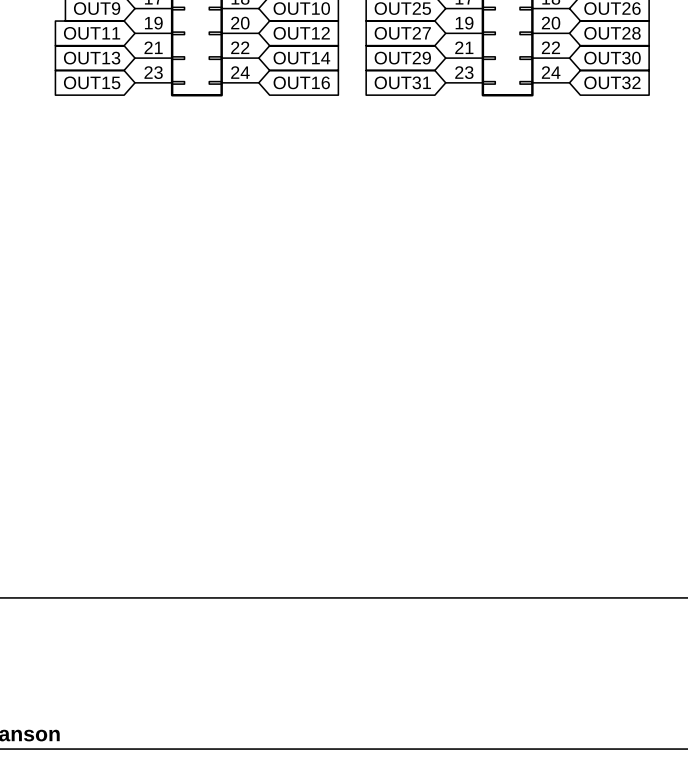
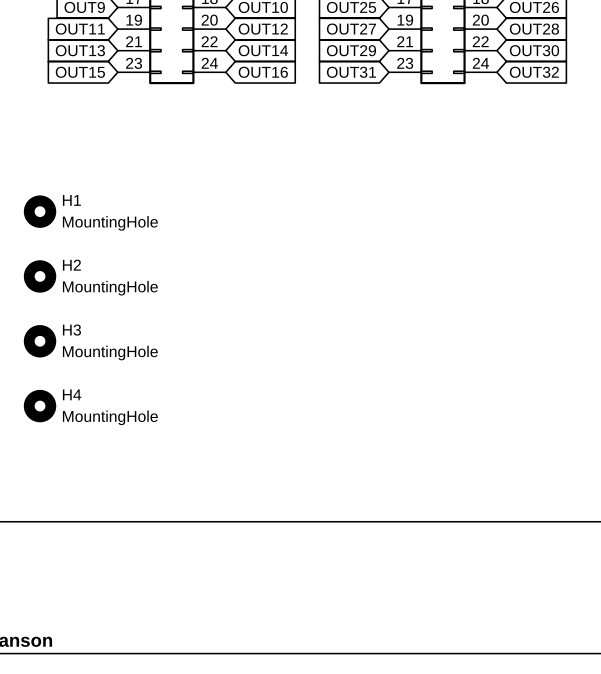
H1: none -> MountingHole (40, 211)
H2: none -> MountingHole (40, 276)
H3: none -> MountingHole (40, 341)
H4: none -> MountingHole (40, 406)

